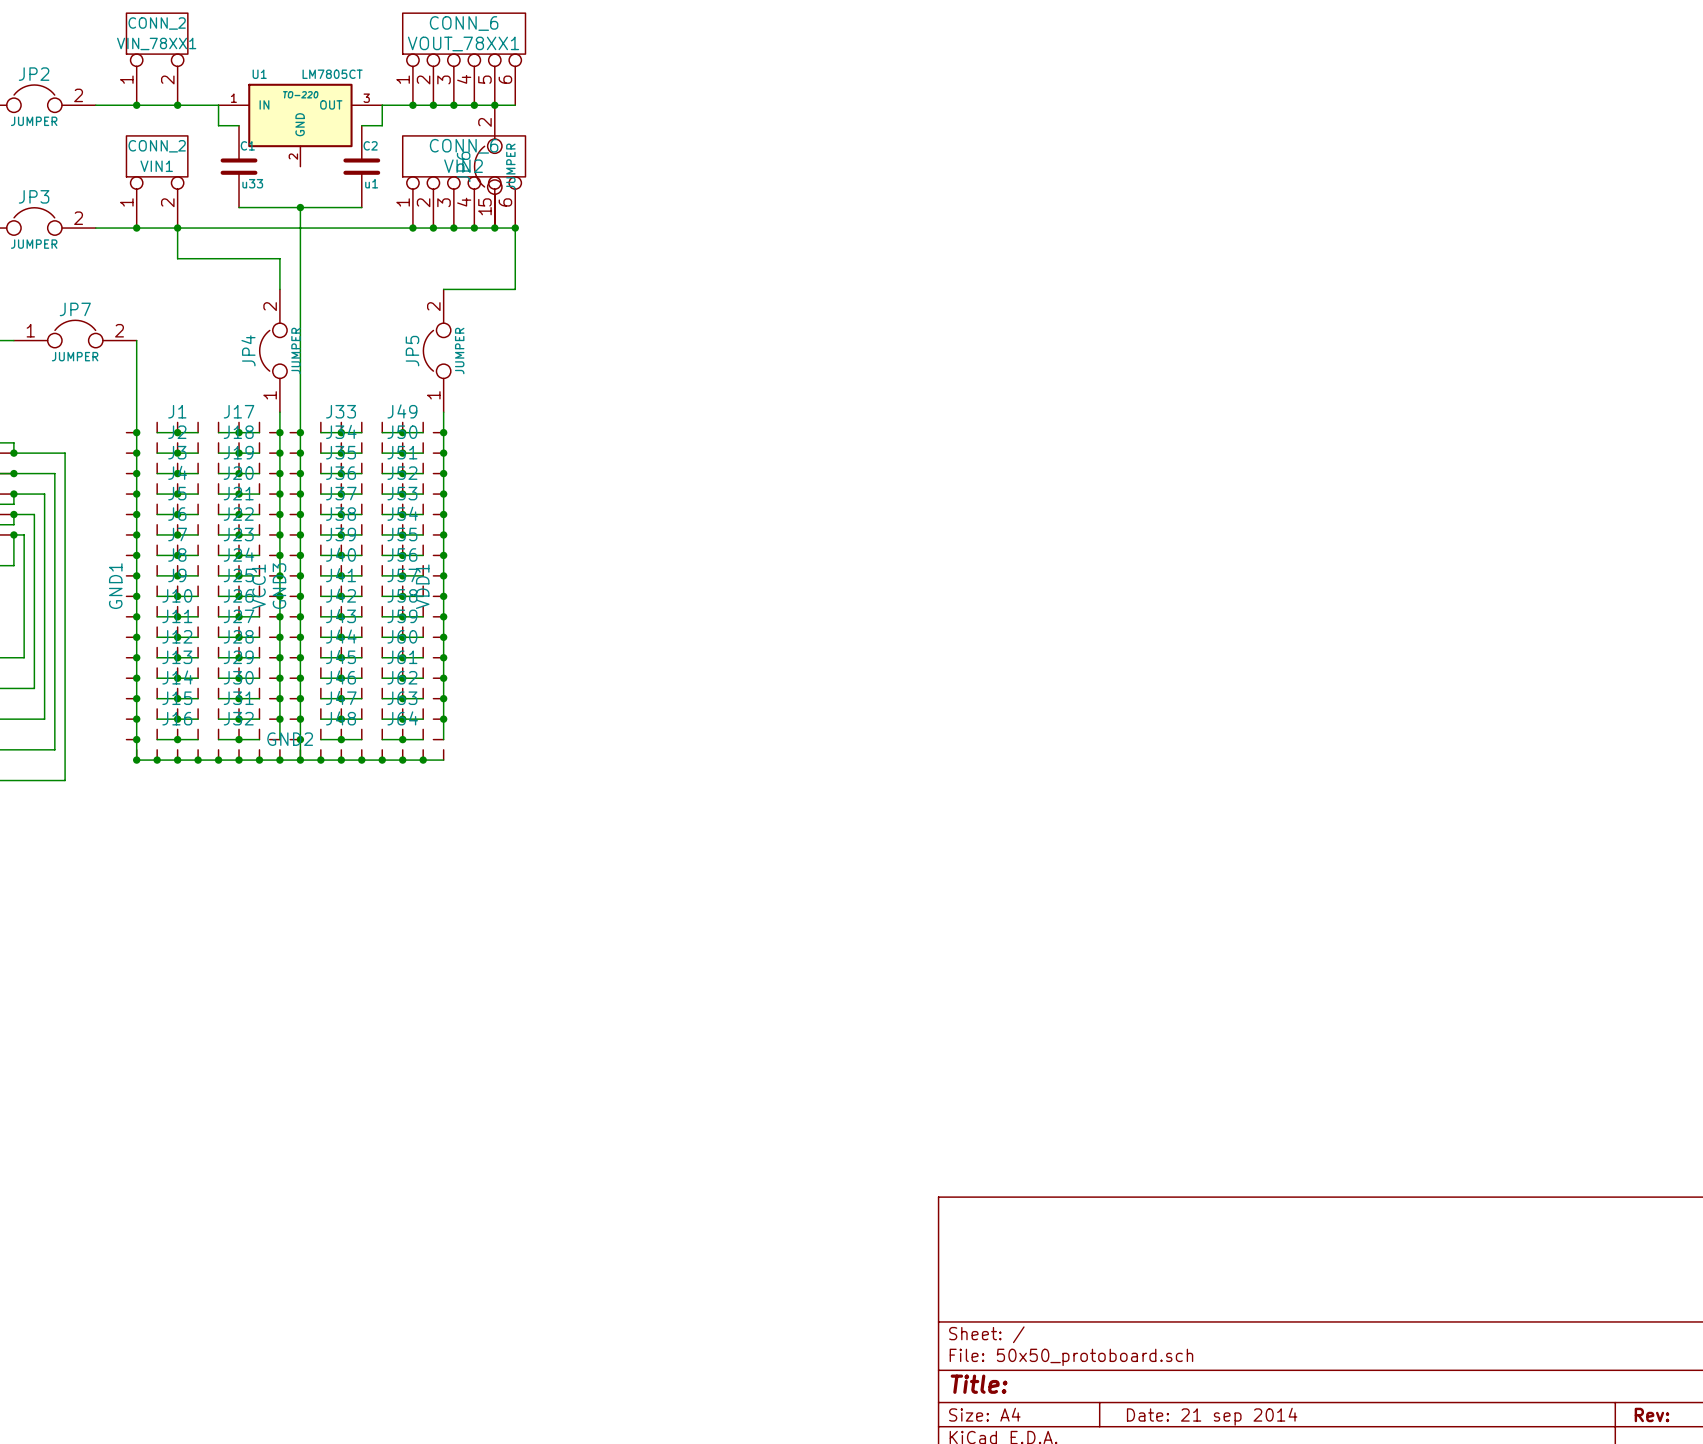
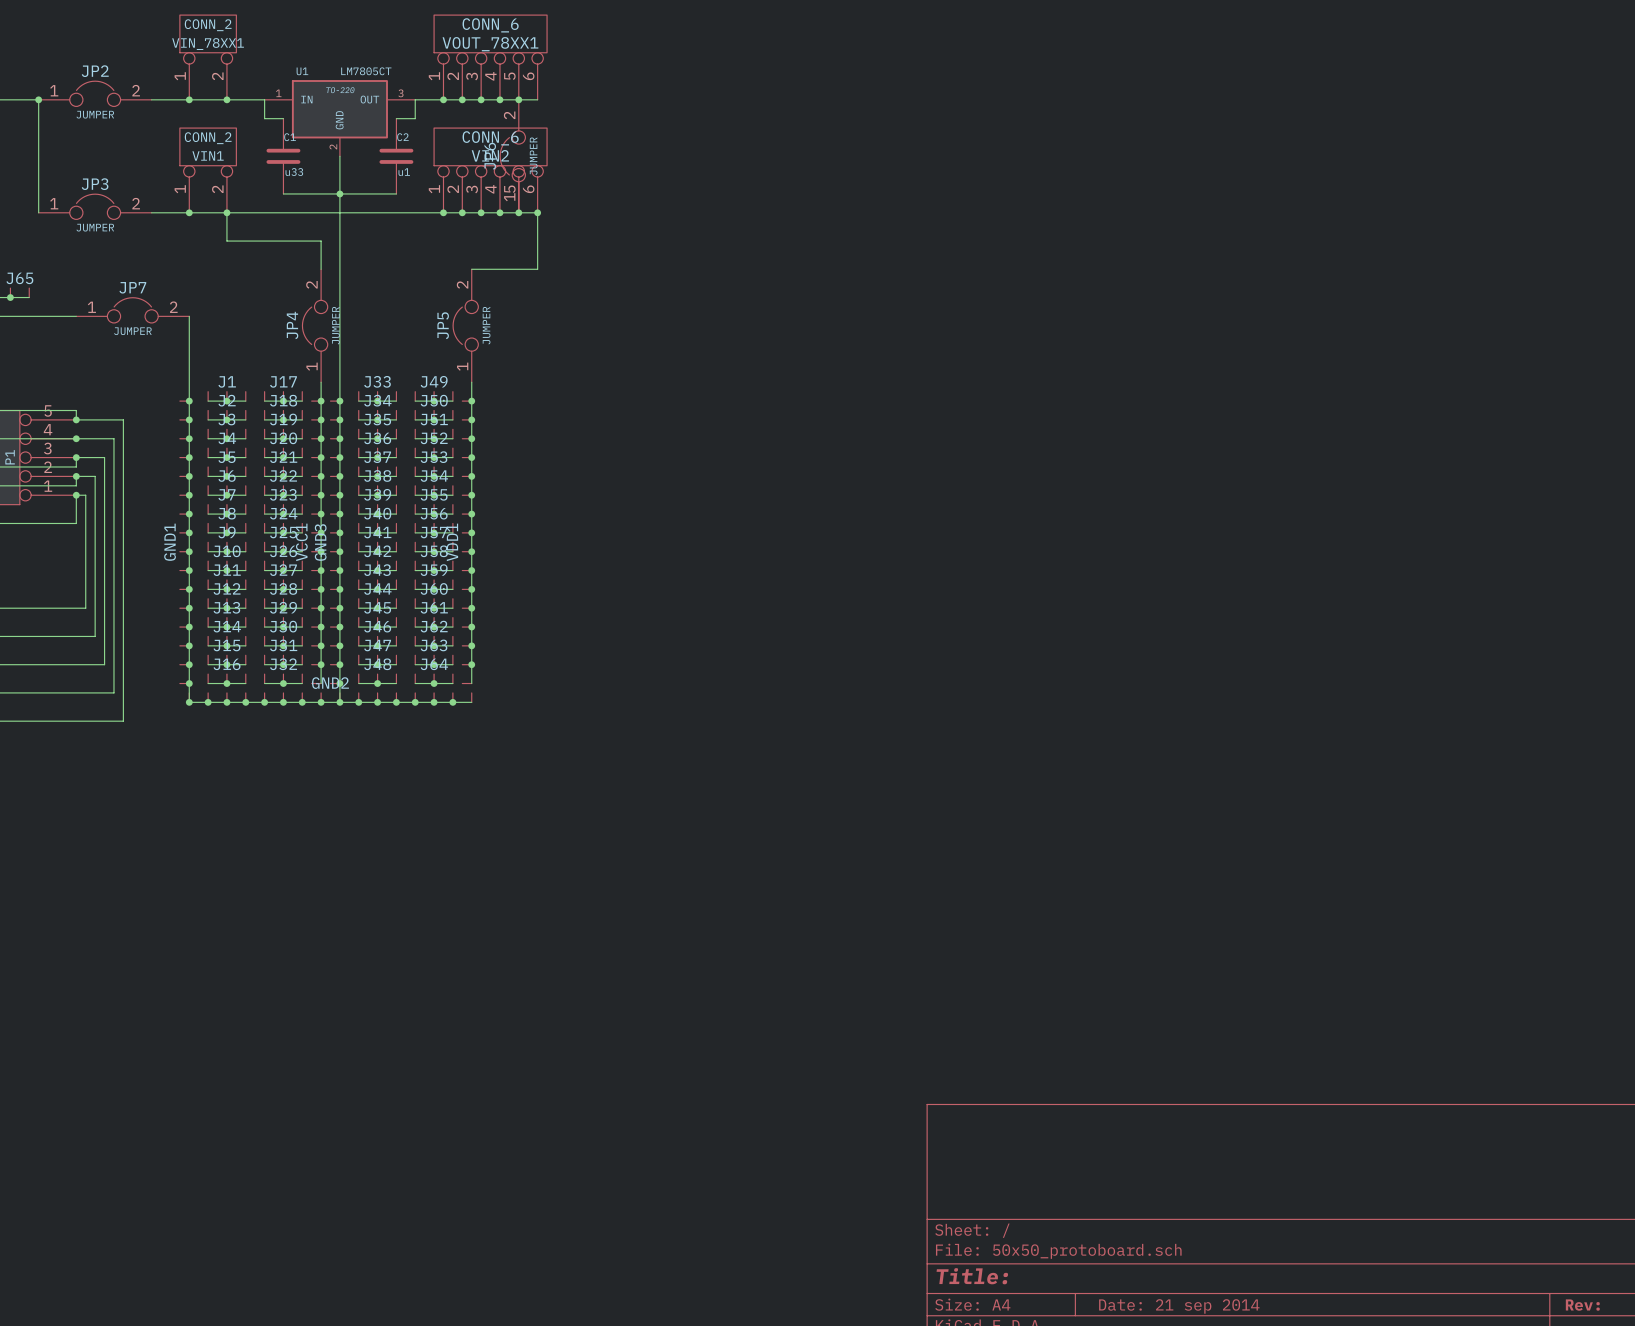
wire: none -> (339, 156) (339, 193)

